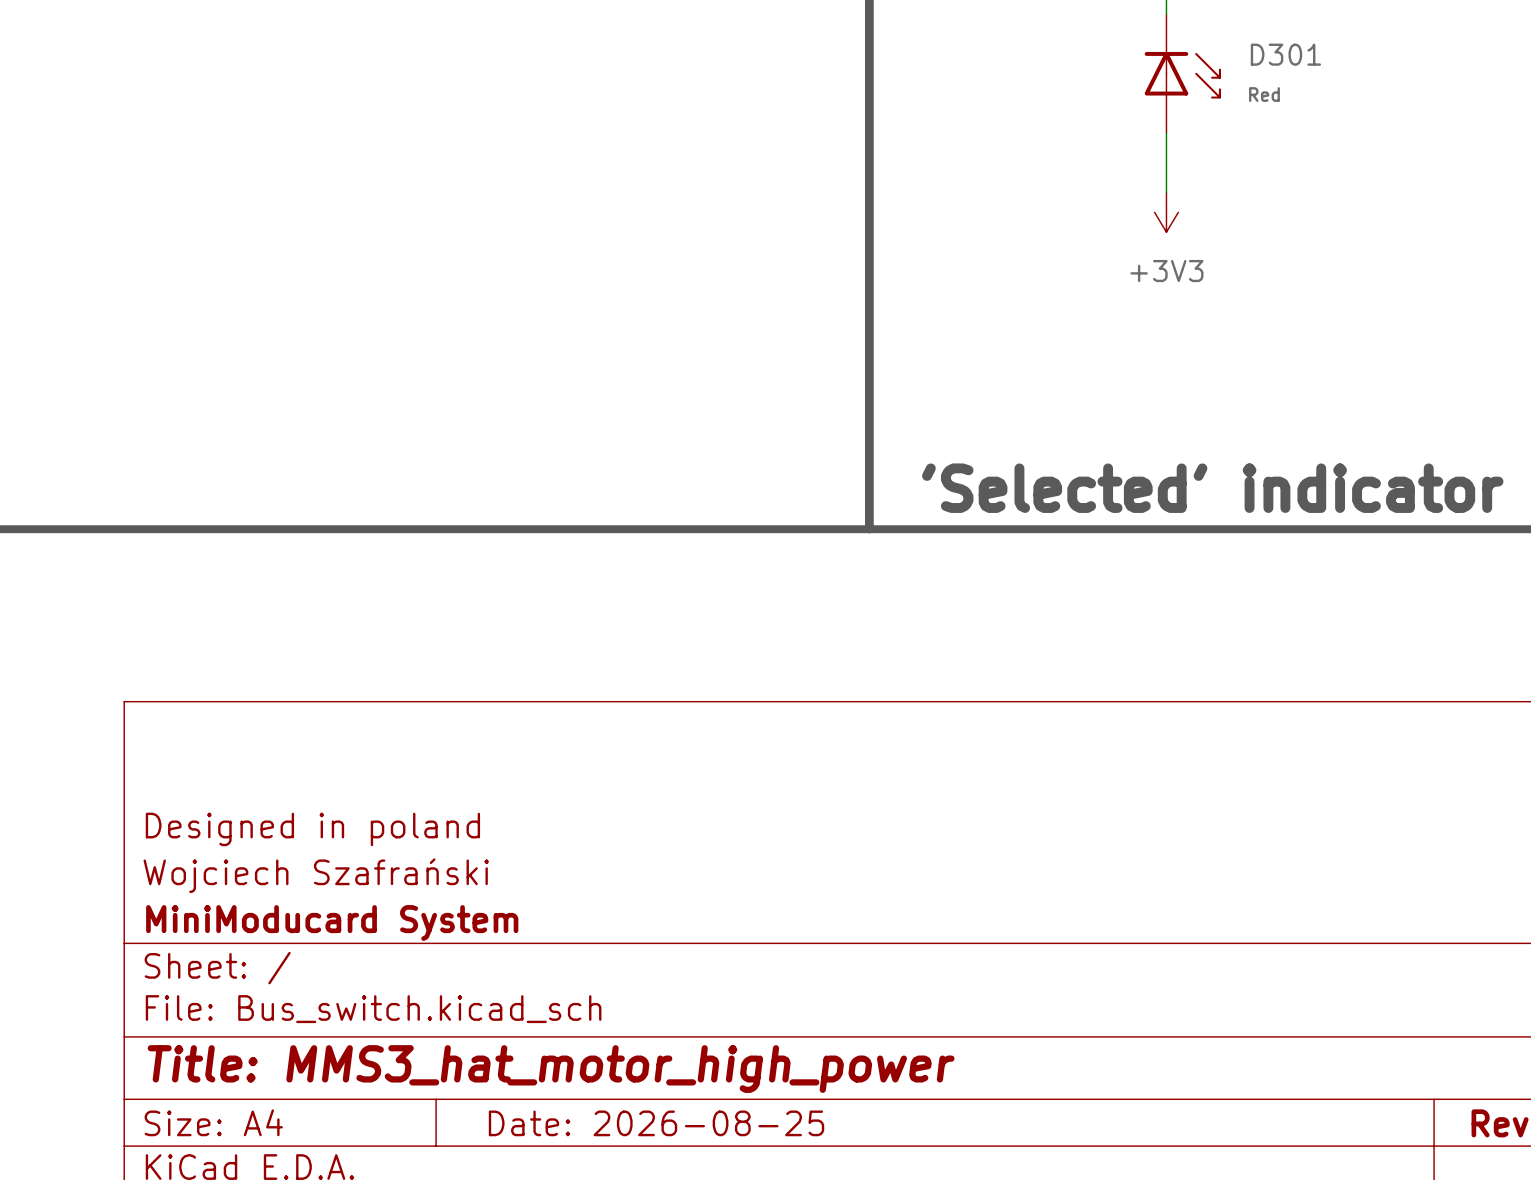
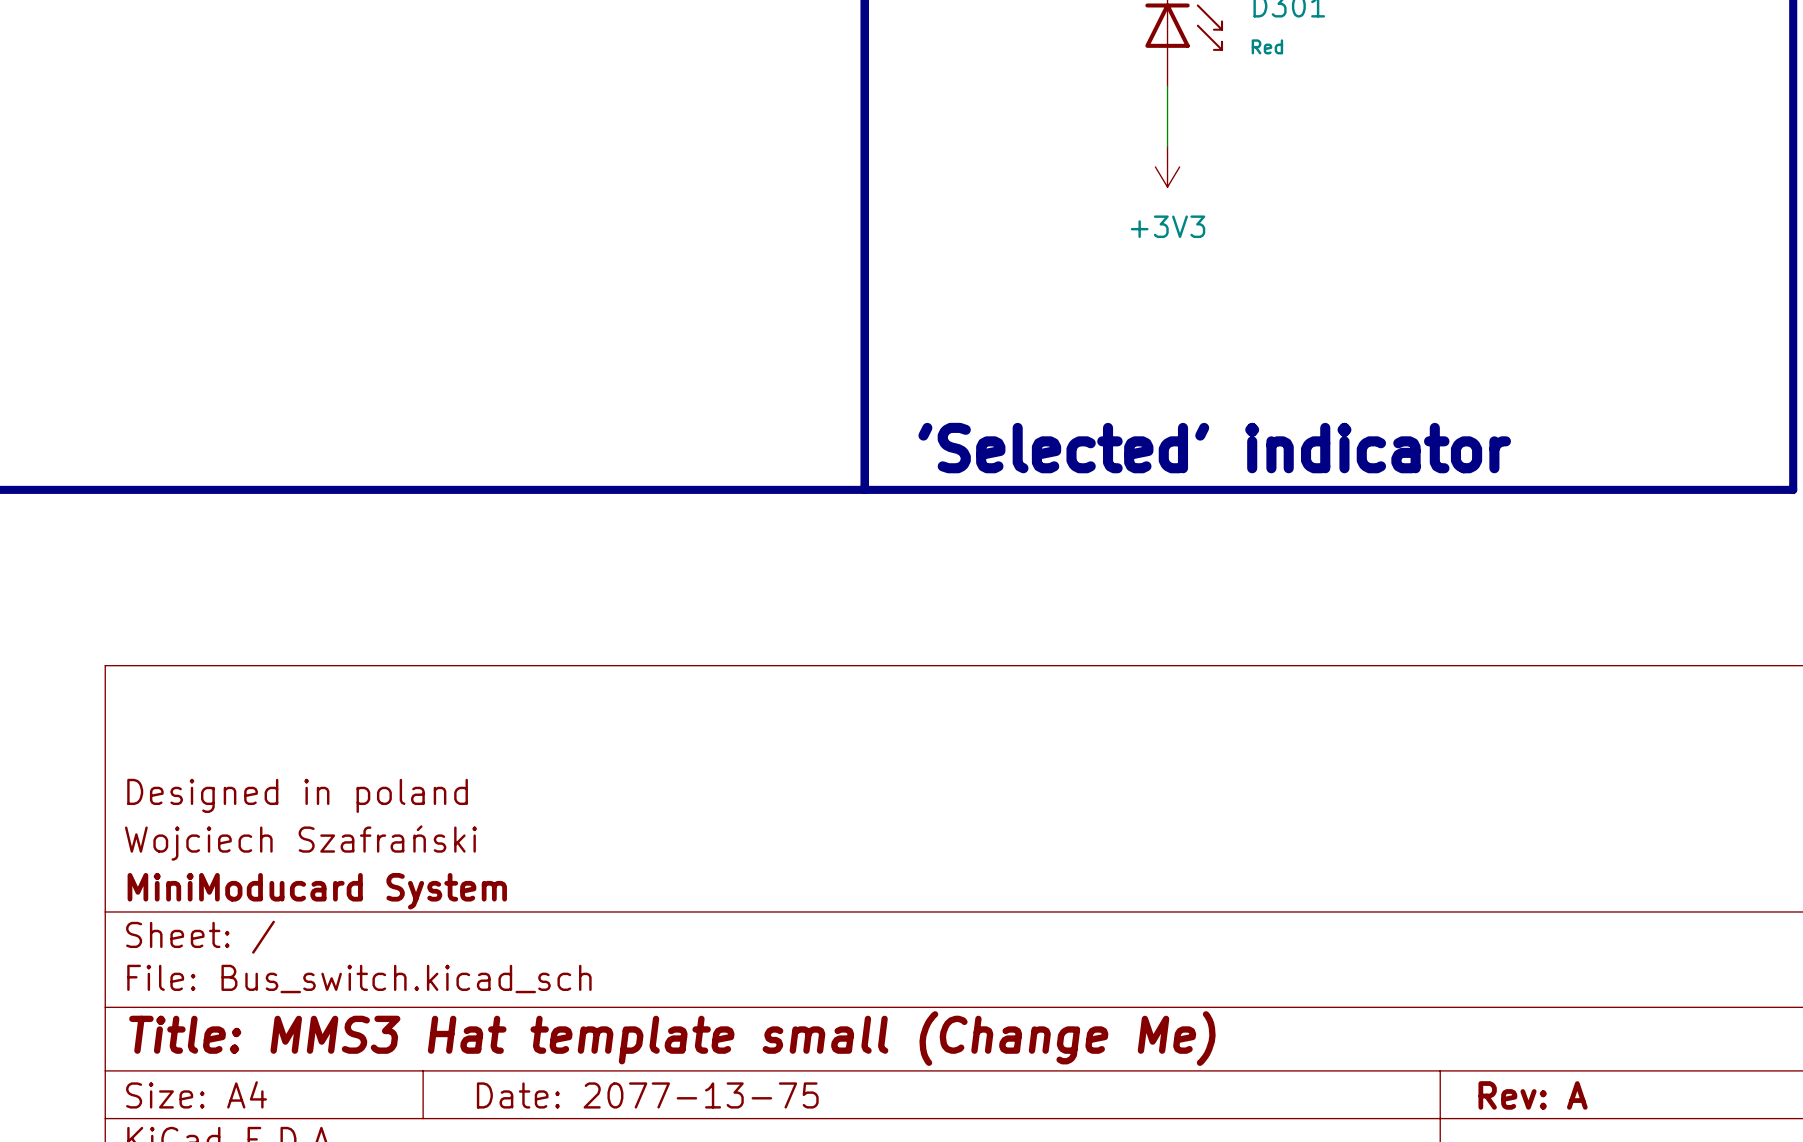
title block: Title: MMS3_hat_motor_high_power (551, 1069) -> Title: MMS3 Hat template small (Change Me) (672, 1038)
title block: Date: 2026-08-25 (656, 1123) -> Date: 2077-13-75 (647, 1095)

